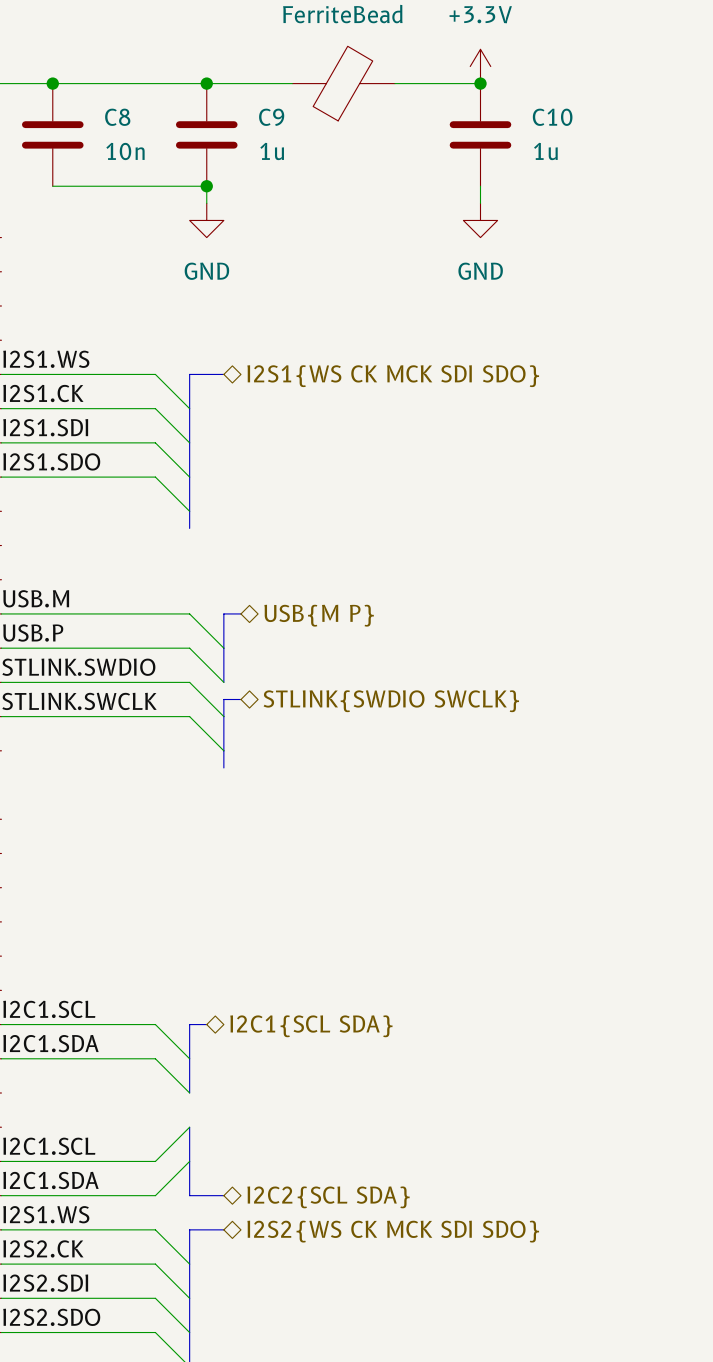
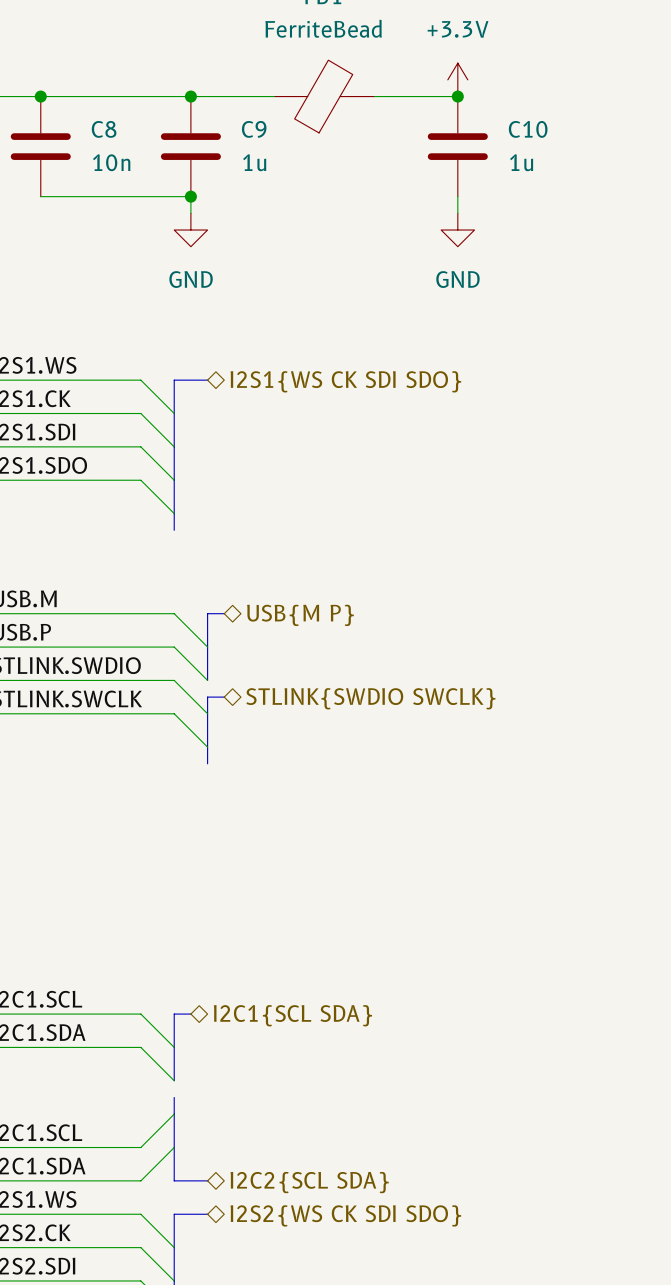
hierarchical label: I2S1{WS CK MCK SDI SDO} (393, 376) -> I2S1{WS CK SDI SDO} (345, 381)
bus: none -> (174, 1097) (174, 1114)
hierarchical label: I2S2{WS CK MCK SDI SDO} (393, 1231) -> I2S2{WS CK SDI SDO} (345, 1215)

